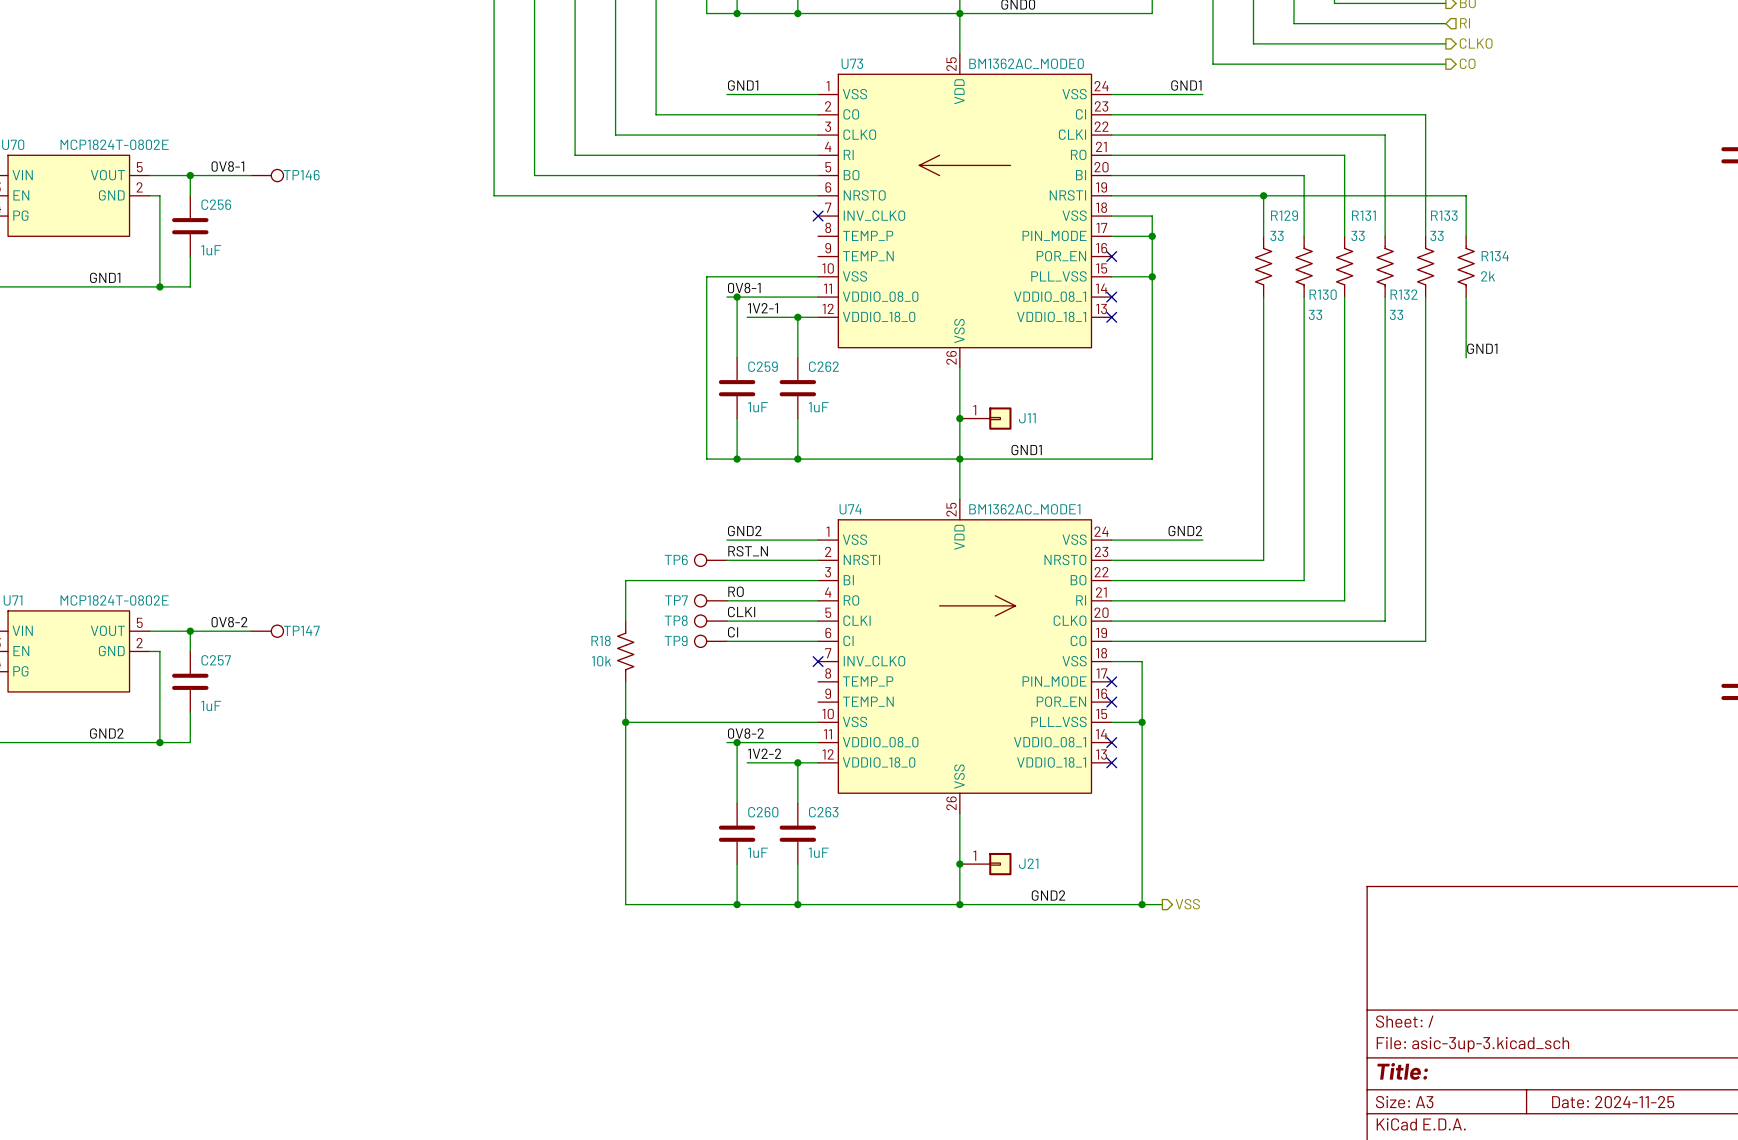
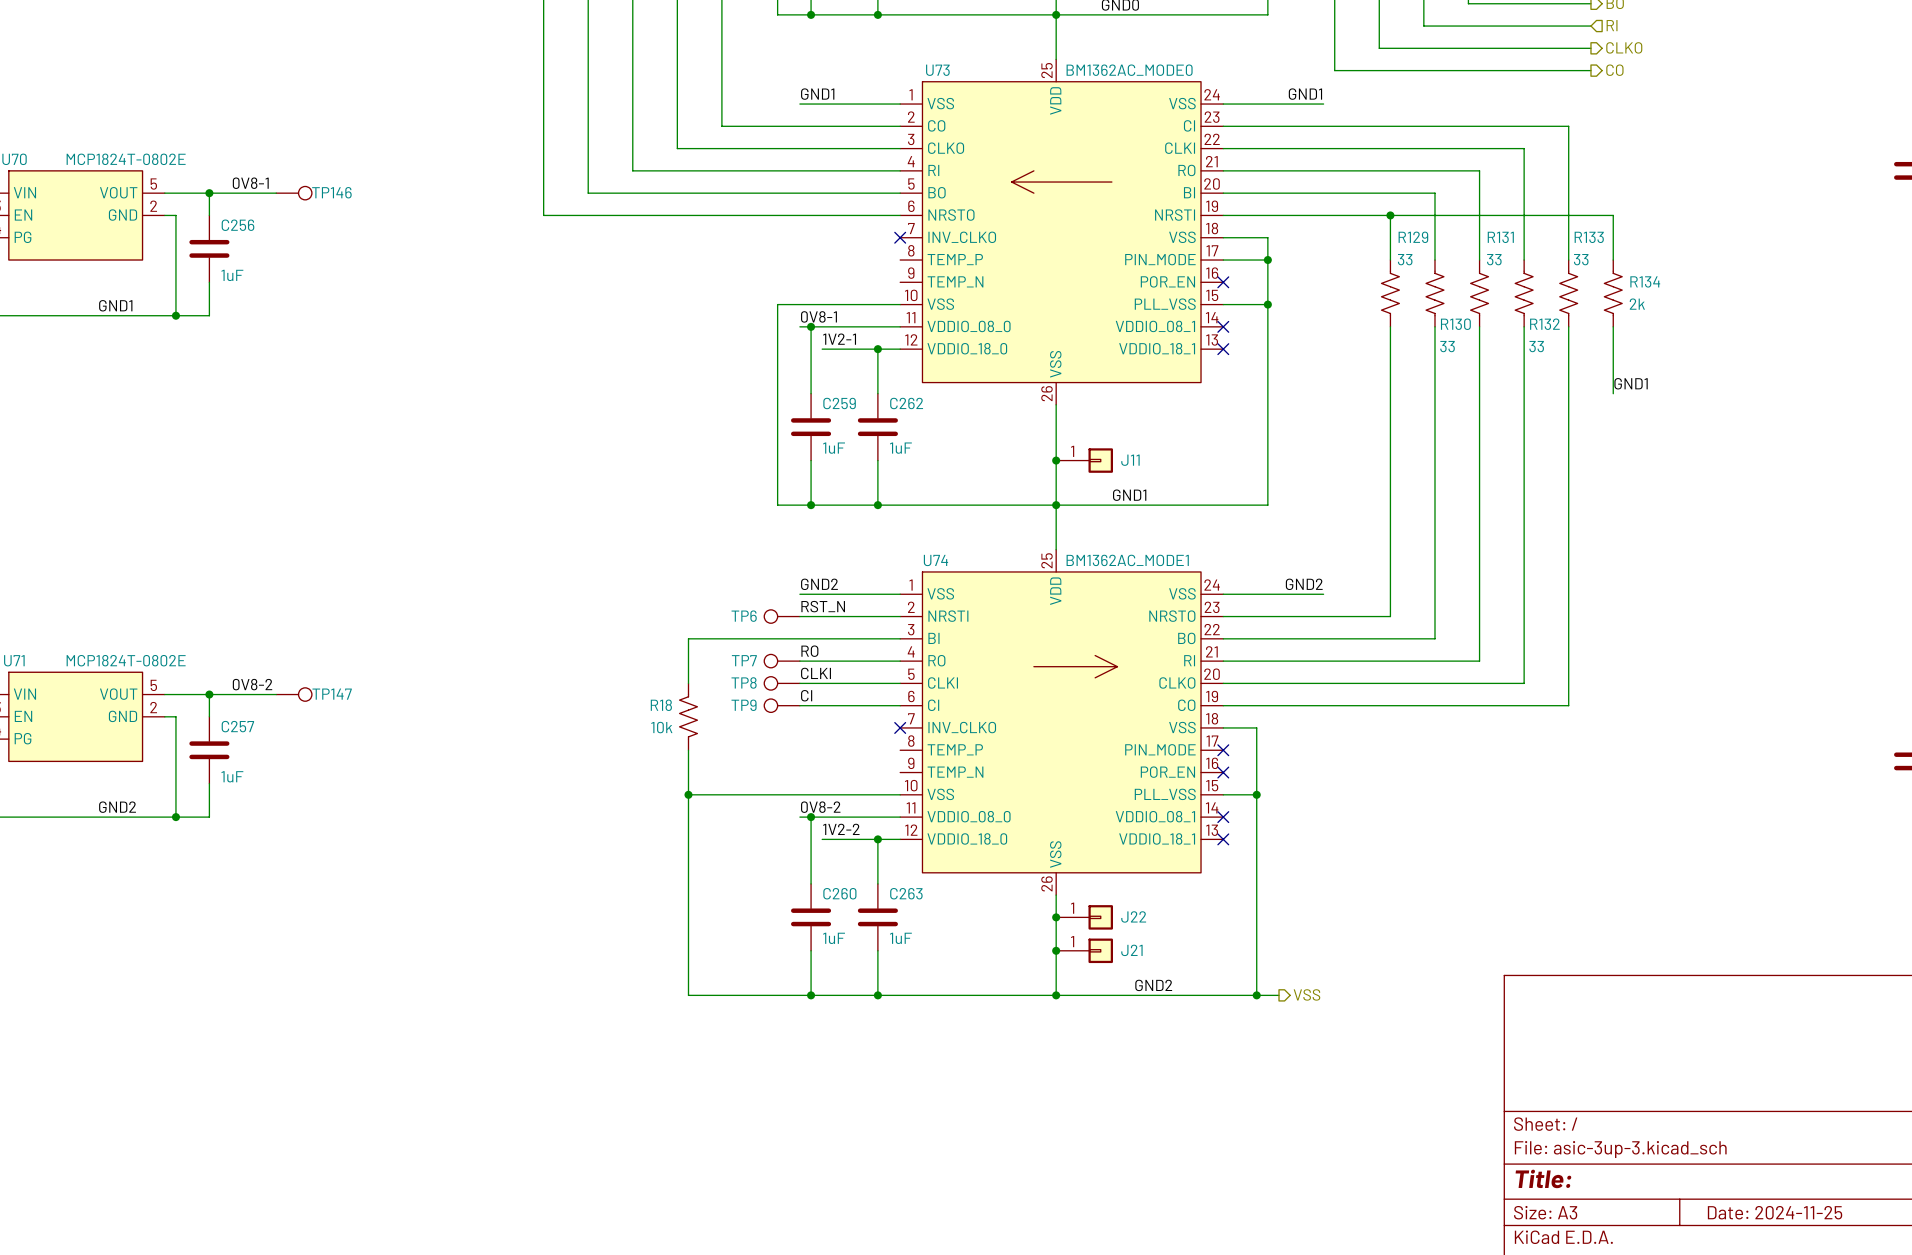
junction: none -> (1056, 917)
J22: none -> (1084, 917)

